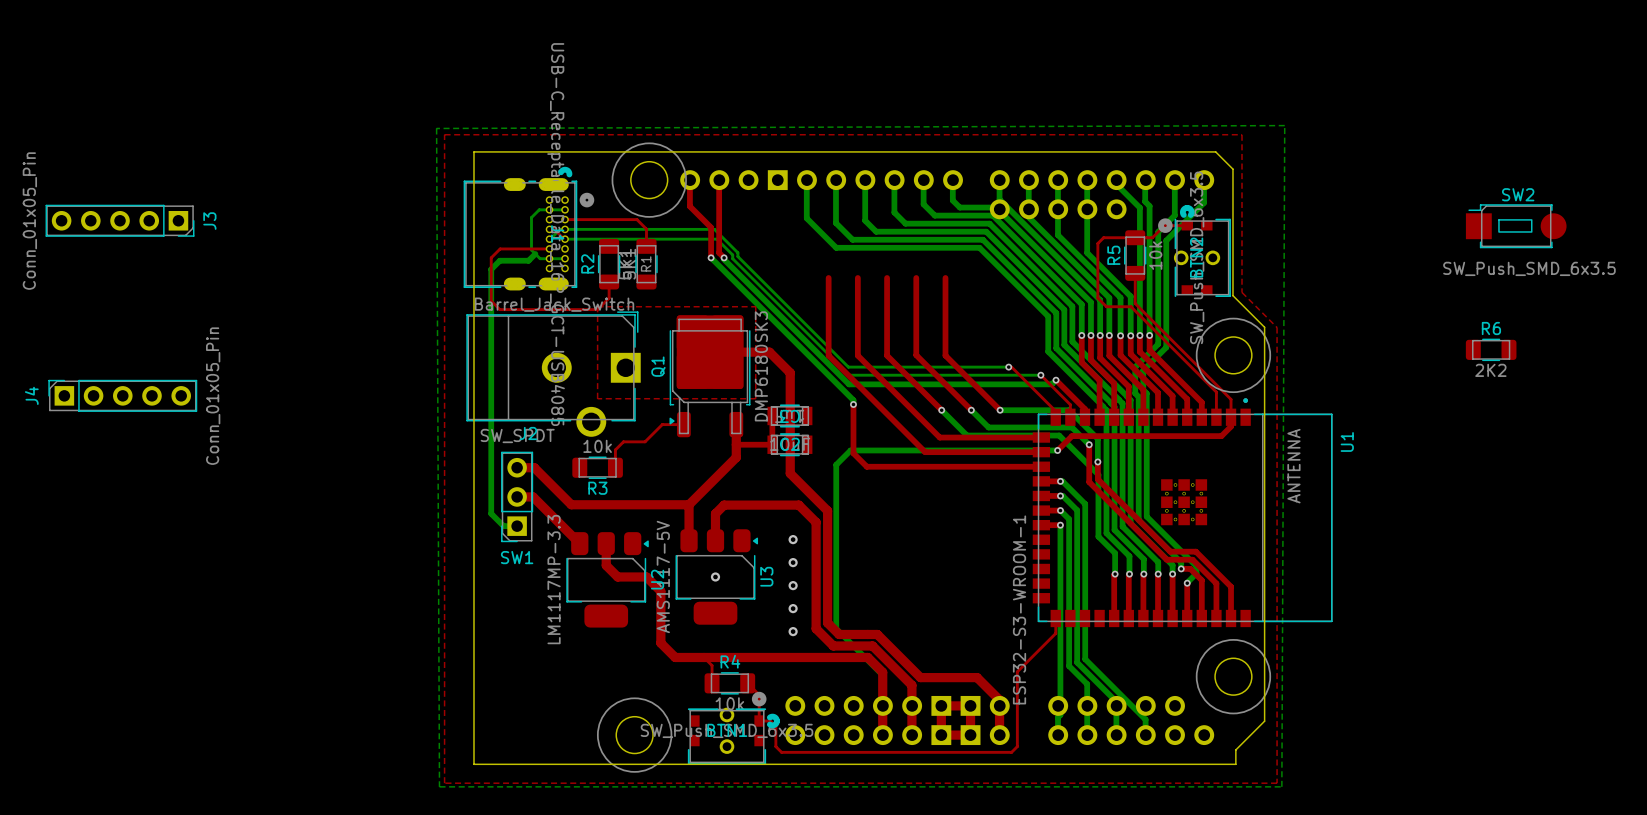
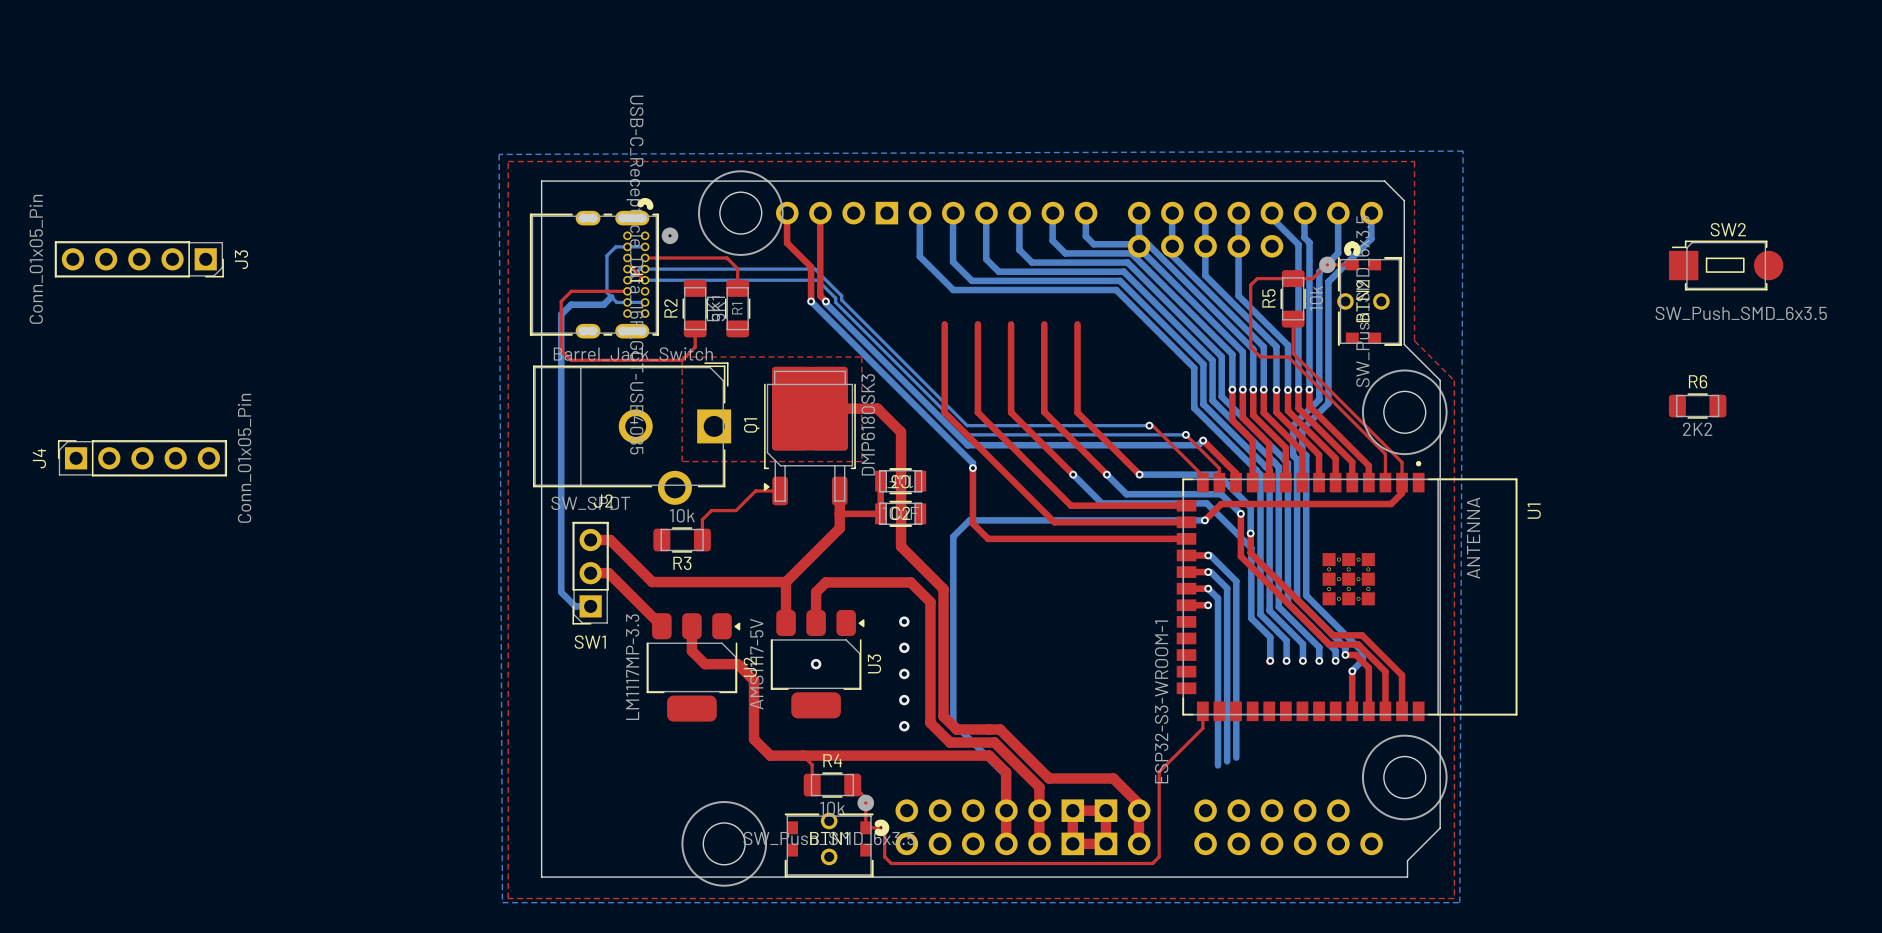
bottom track: (1060, 525) (1060, 715) (1057, 717) (1057, 736) -> none
top track: (1128, 574) (1128, 618) -> none
top track: (1143, 574) (1143, 618) -> none
top track: (1158, 574) (1158, 618) -> none
top track: (1172, 574) (1172, 618) -> none
top track: (1114, 575) (1114, 618) -> none
bottom track: (1085, 659) (1145, 719) (1145, 736) -> none
bottom track: (1077, 662) (1116, 701) (1116, 736) -> none
bottom track: (1069, 666) (1087, 684) (1087, 736) -> none

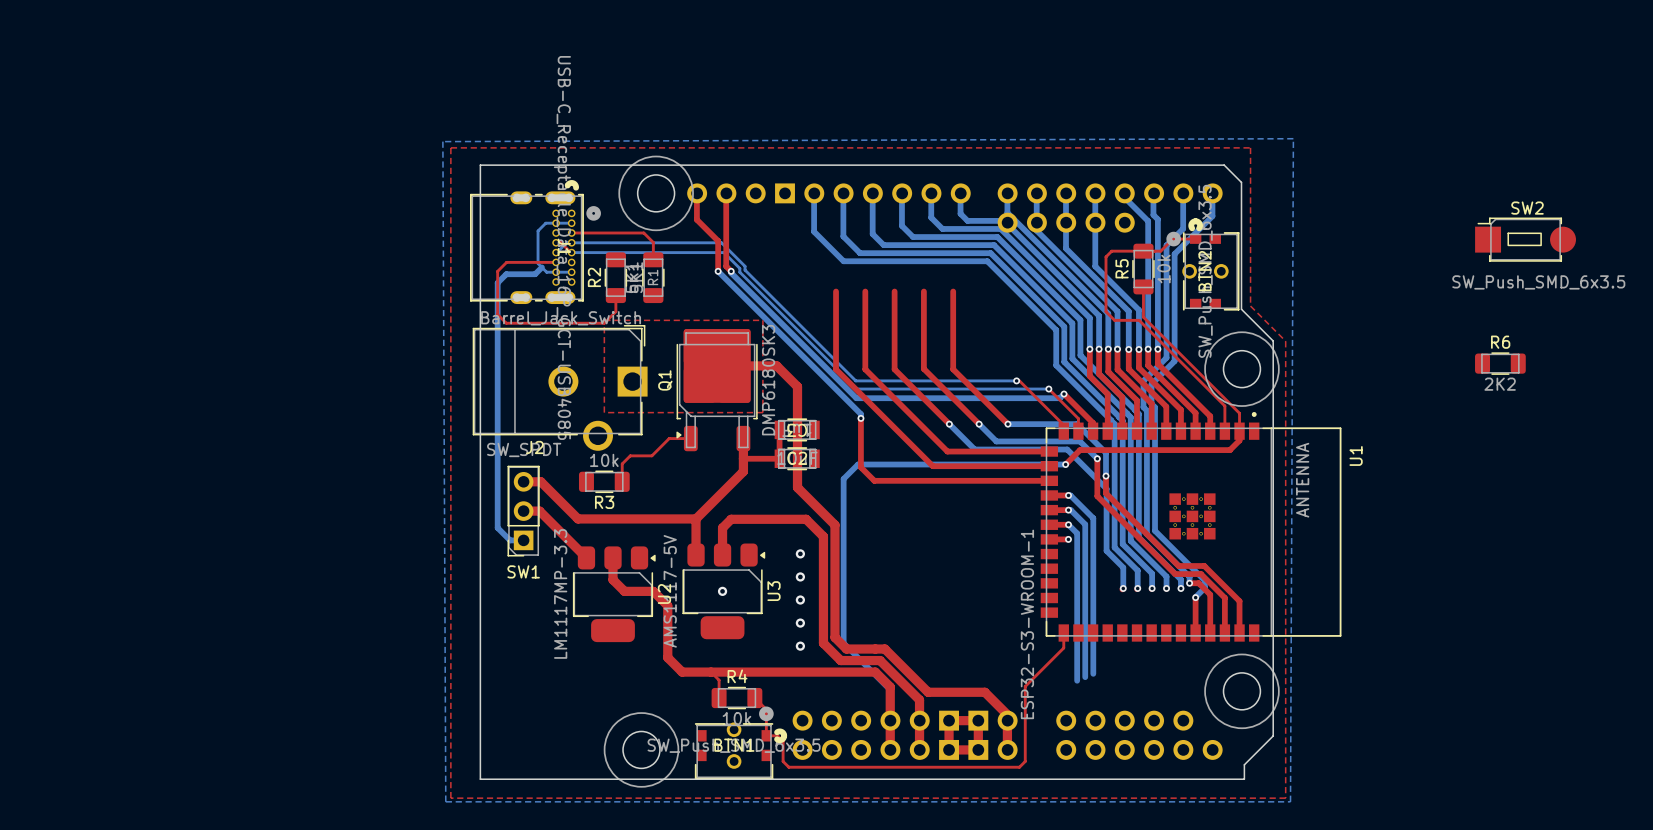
J3: Conn_01x05_Pin (139, 259) -> none
J4: Conn_01x05_Pin (142, 458) -> none

